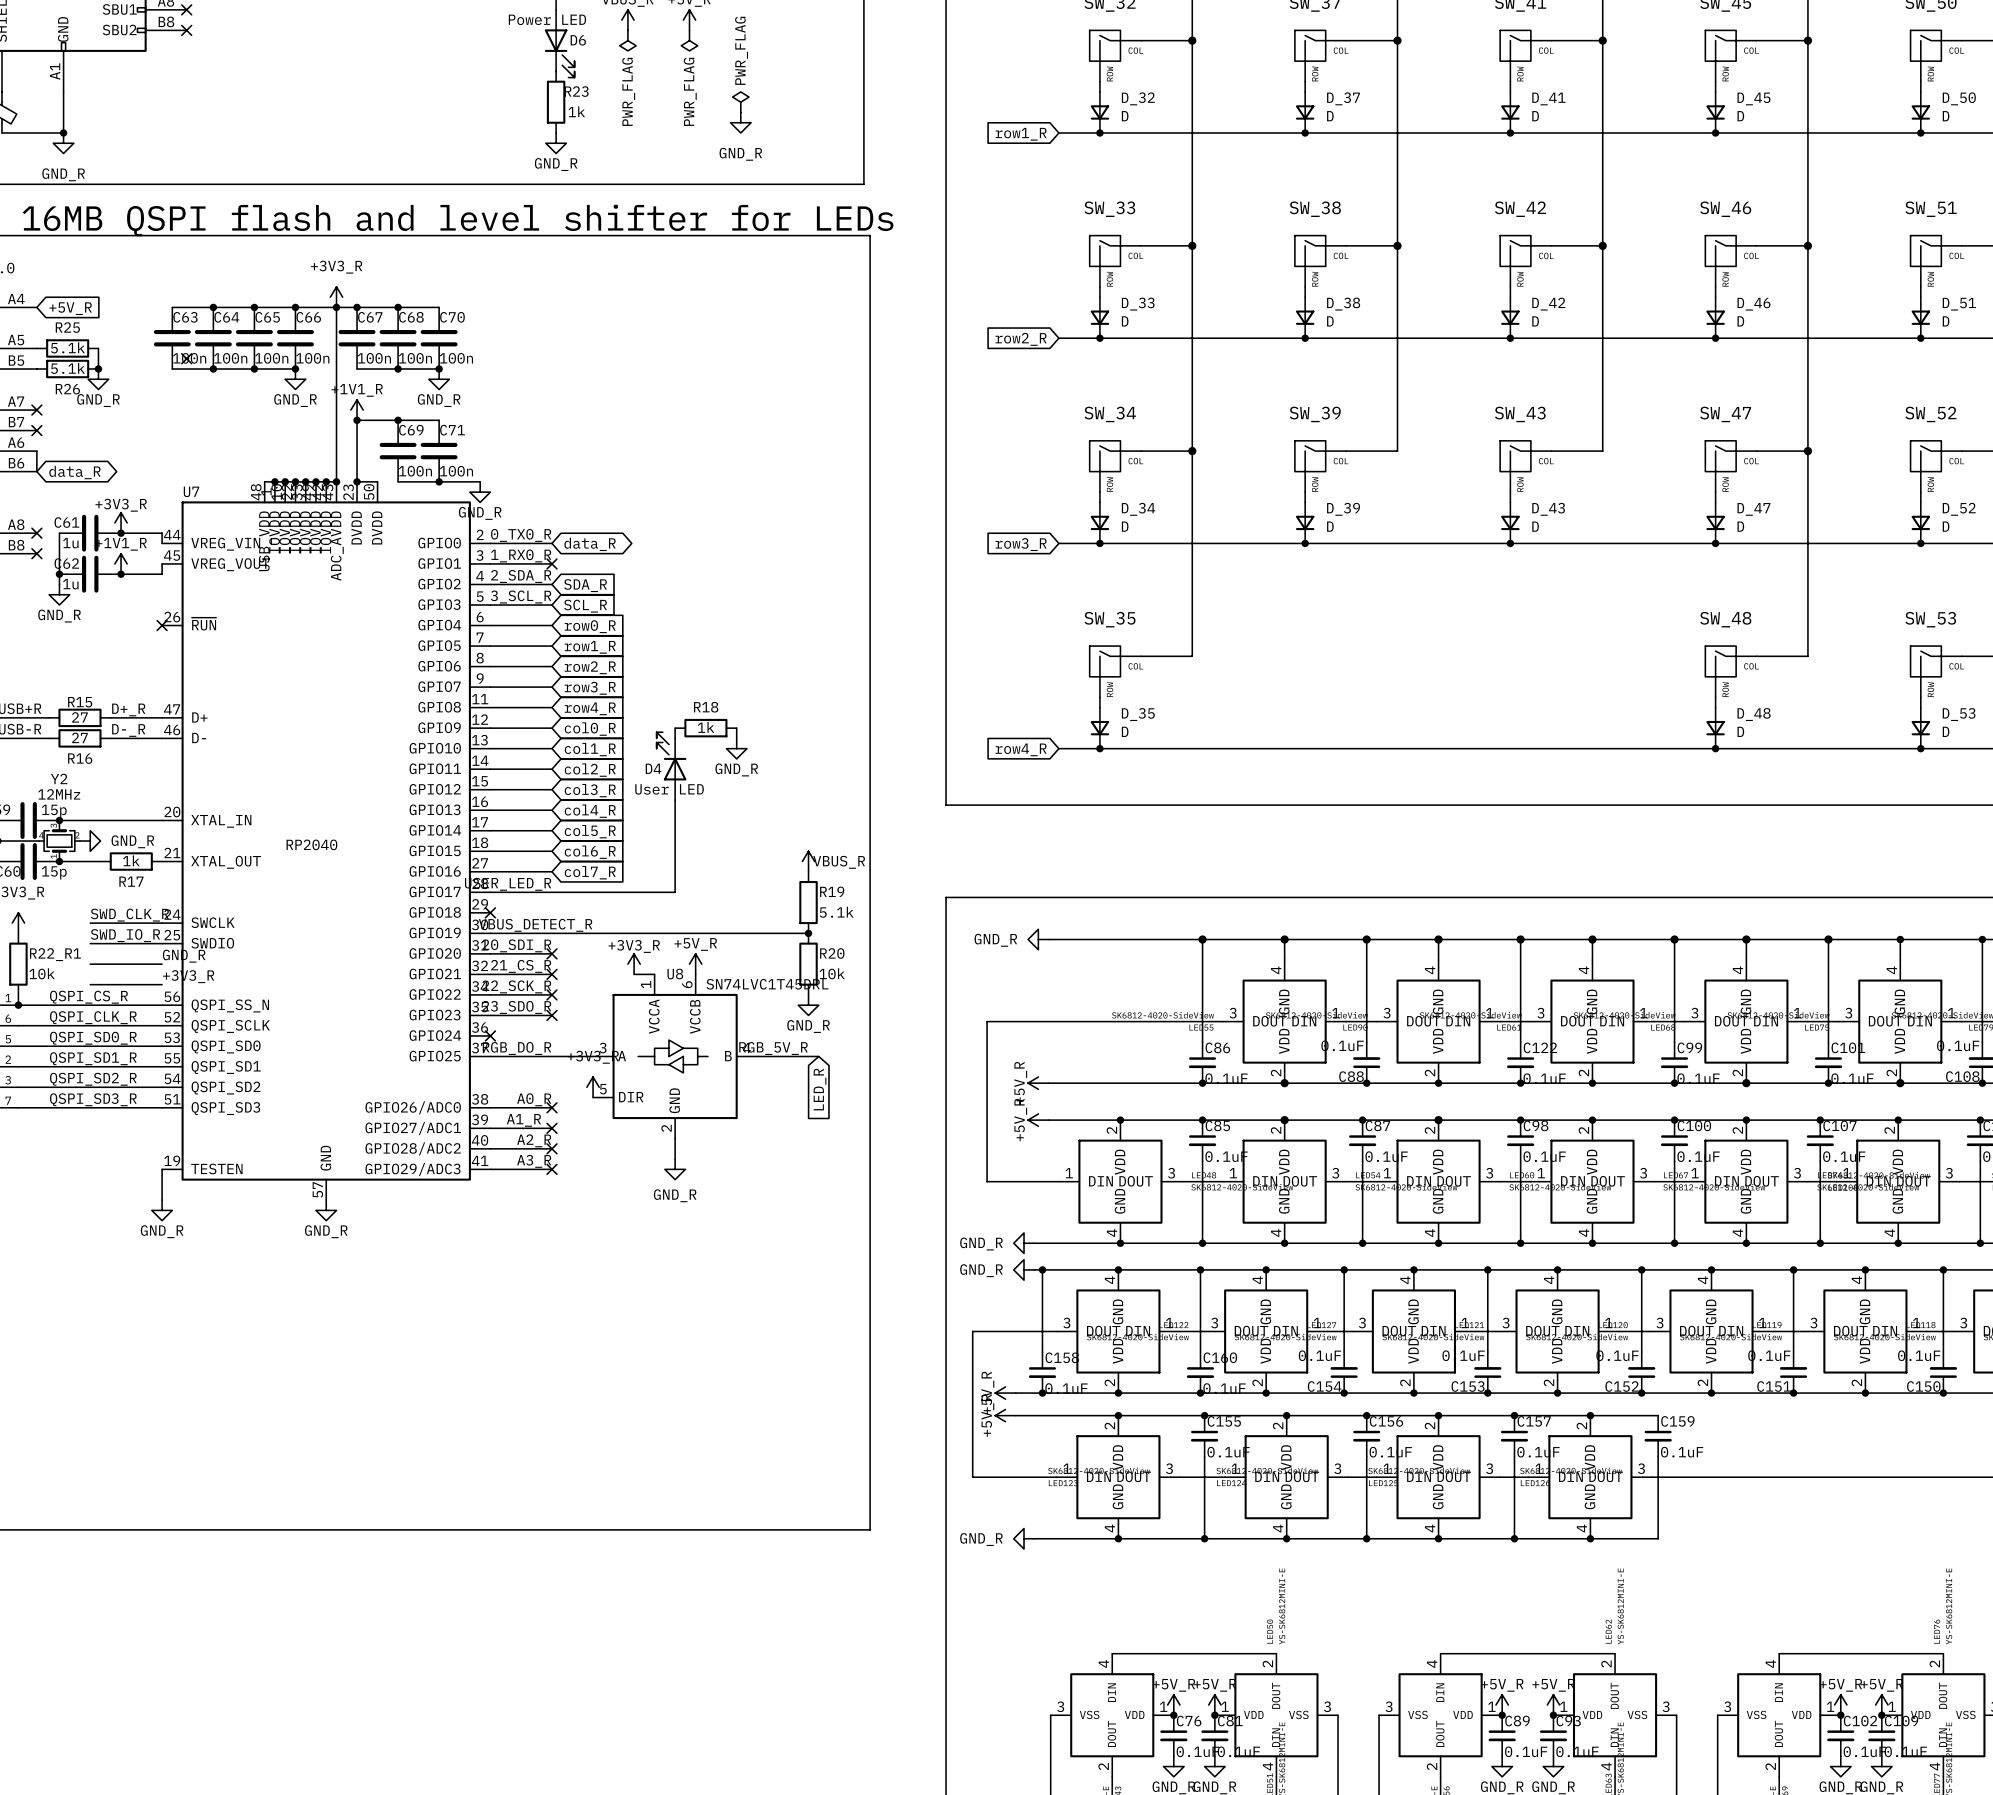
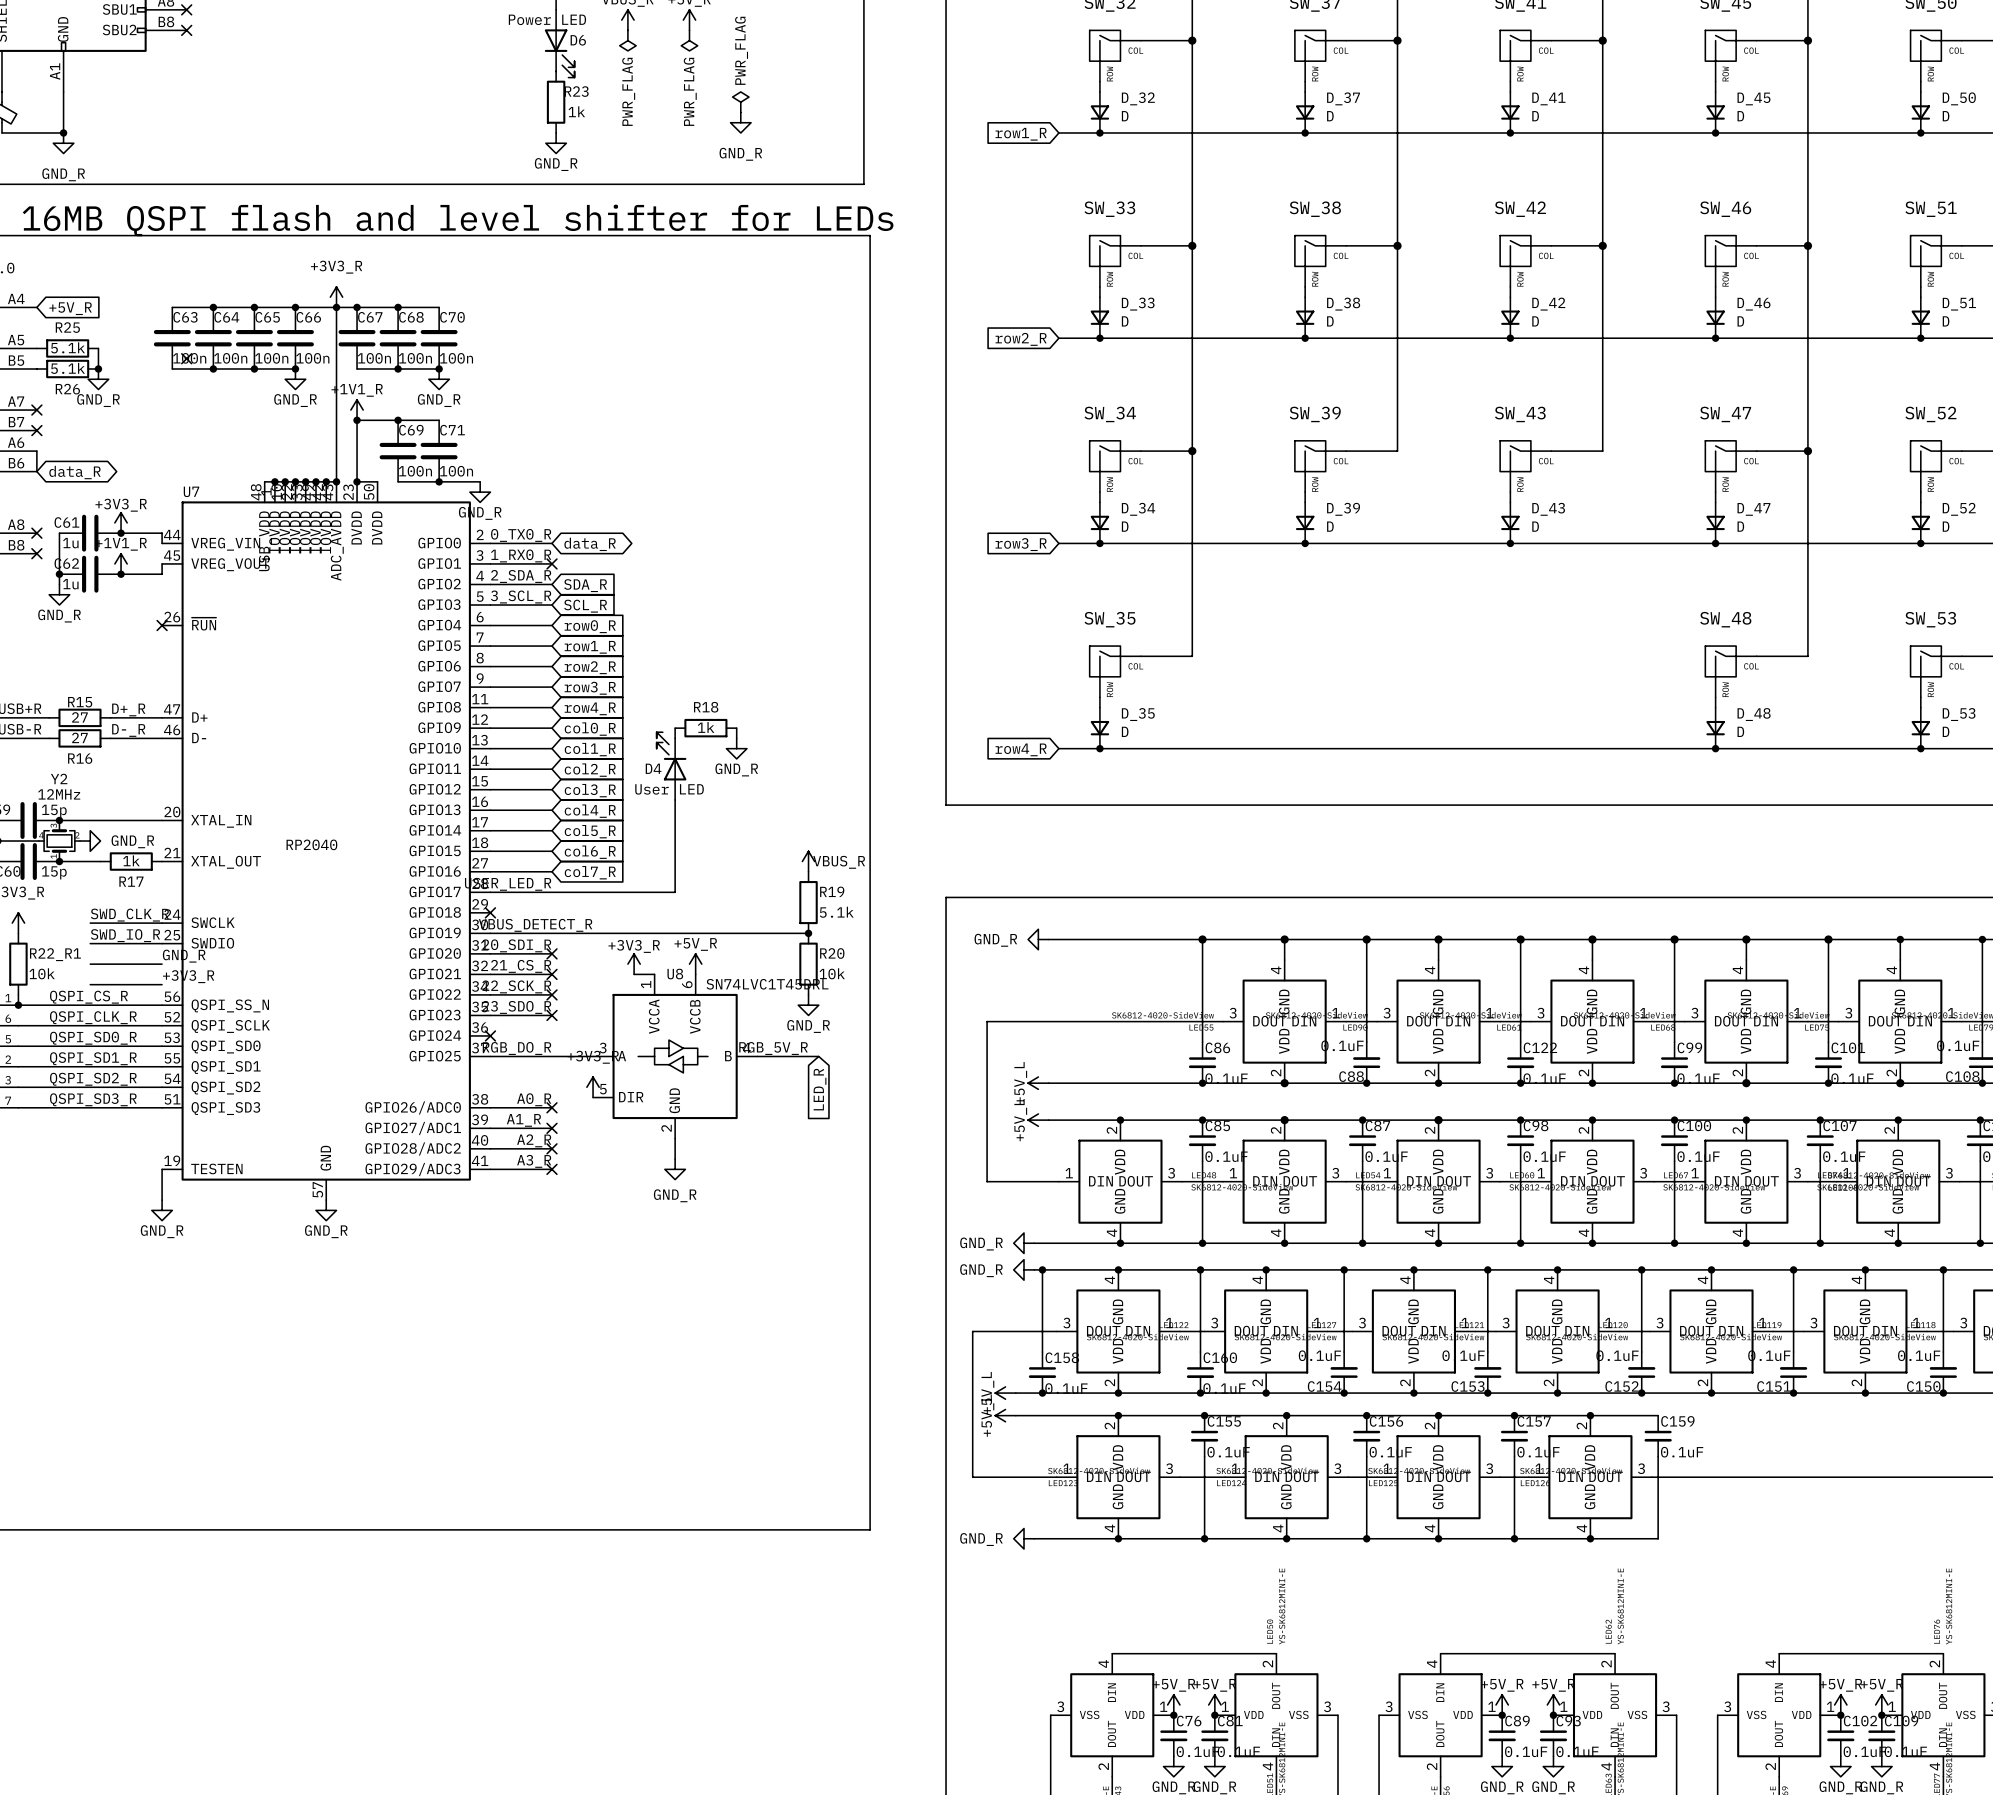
power symbol: +5V_R (1038, 1083) -> +5V_L (1038, 1083)
power symbol: +5V_R (1038, 1120) -> +5V_L (1038, 1120)
power symbol: +5V_R (1005, 1393) -> +5V_L (1005, 1393)
power symbol: +5V_R (1005, 1415) -> +5V_L (1005, 1415)

